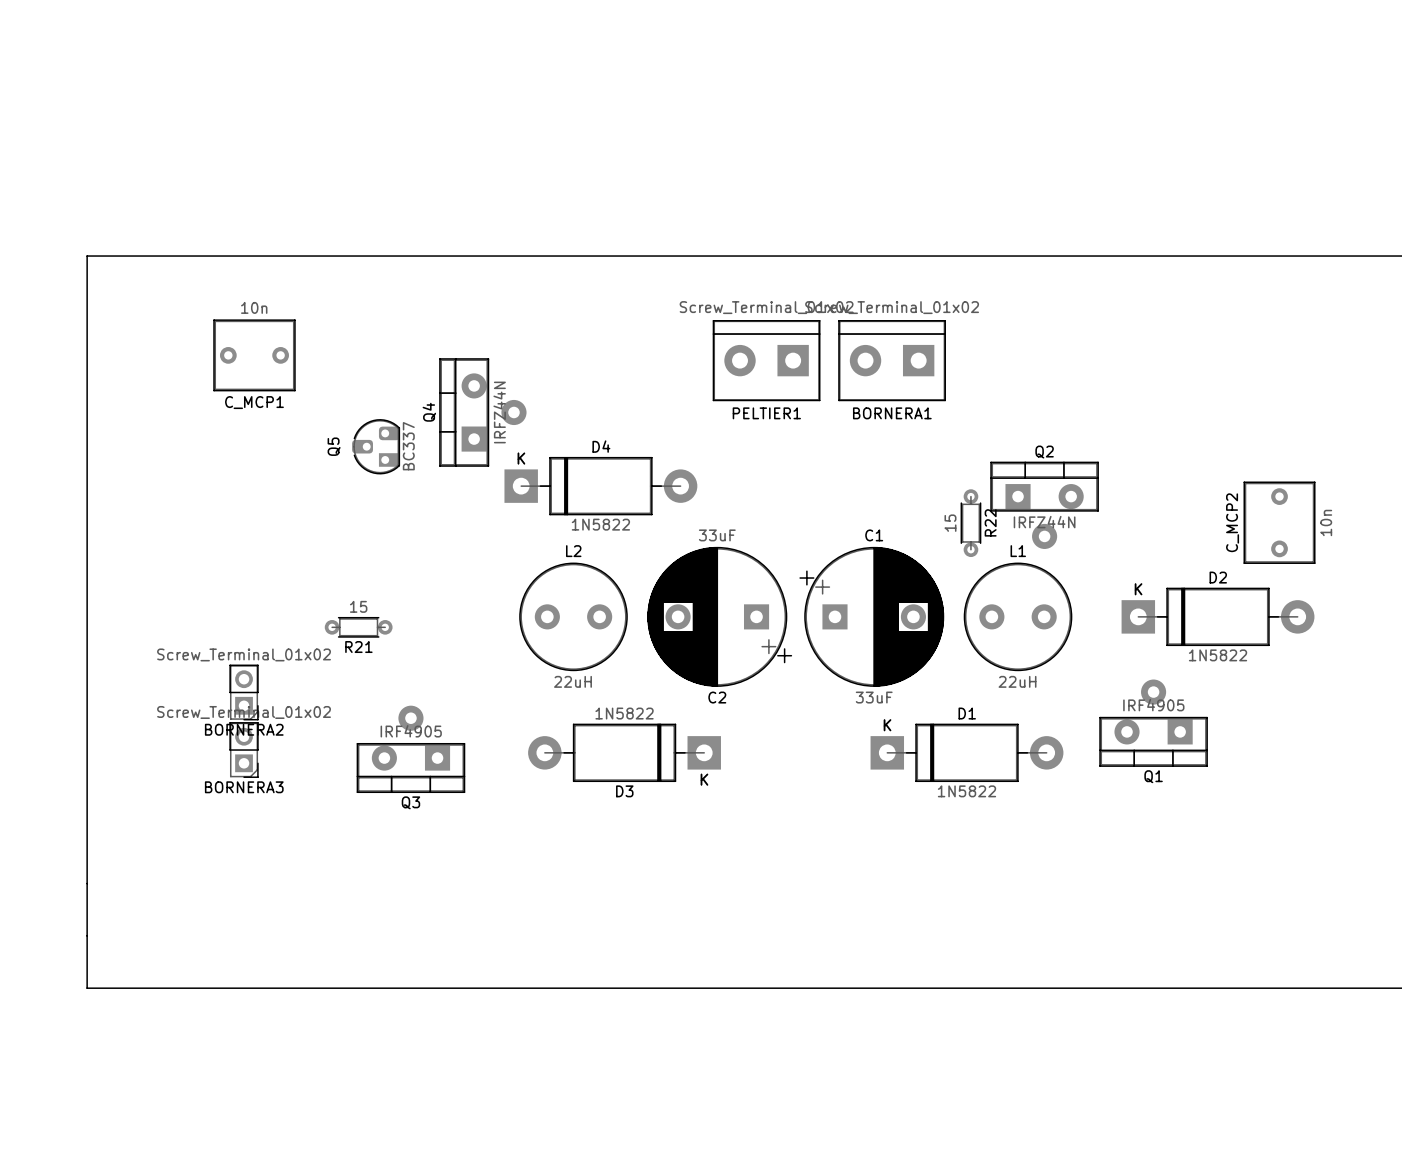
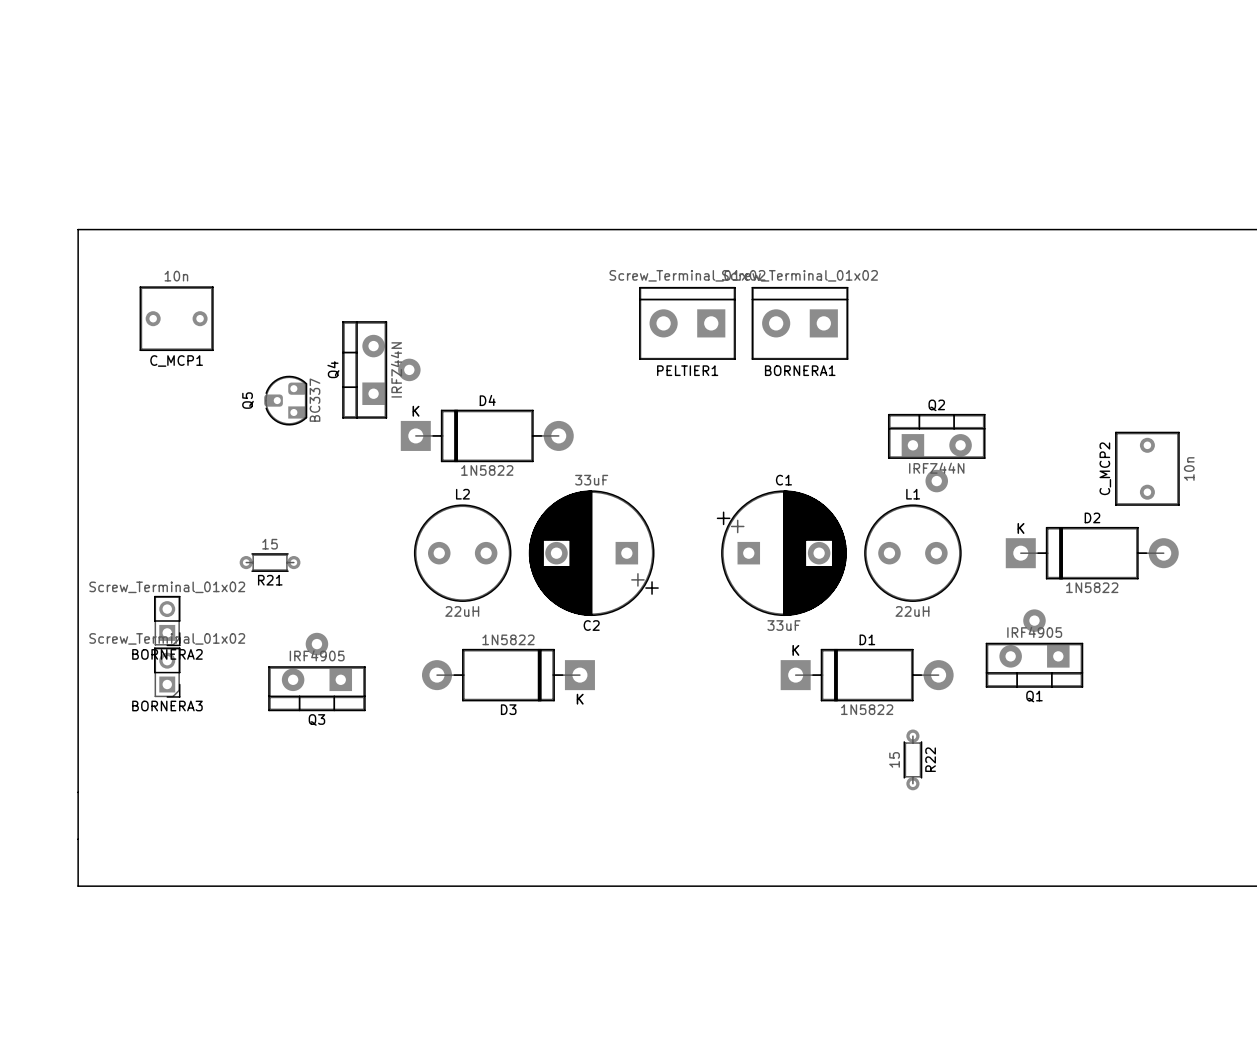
C_MCP1 position: (254, 355) -> (176, 318)
Q4 position: (482, 412) -> (381, 369)
Q5 position: (376, 446) -> (285, 400)
D4 position: (600, 486) -> (487, 435)
R22 position: (970, 523) -> (912, 759)
L2 position: (573, 616) -> (462, 553)
C2 position: (719, 616) -> (593, 553)
R21 position: (358, 627) -> (270, 562)
BORNERA2 position: (244, 692) -> (167, 621)
Q3 position: (410, 749) -> (316, 671)
BORNERA3 position: (244, 750) -> (167, 672)
D3 position: (624, 752) -> (508, 675)

